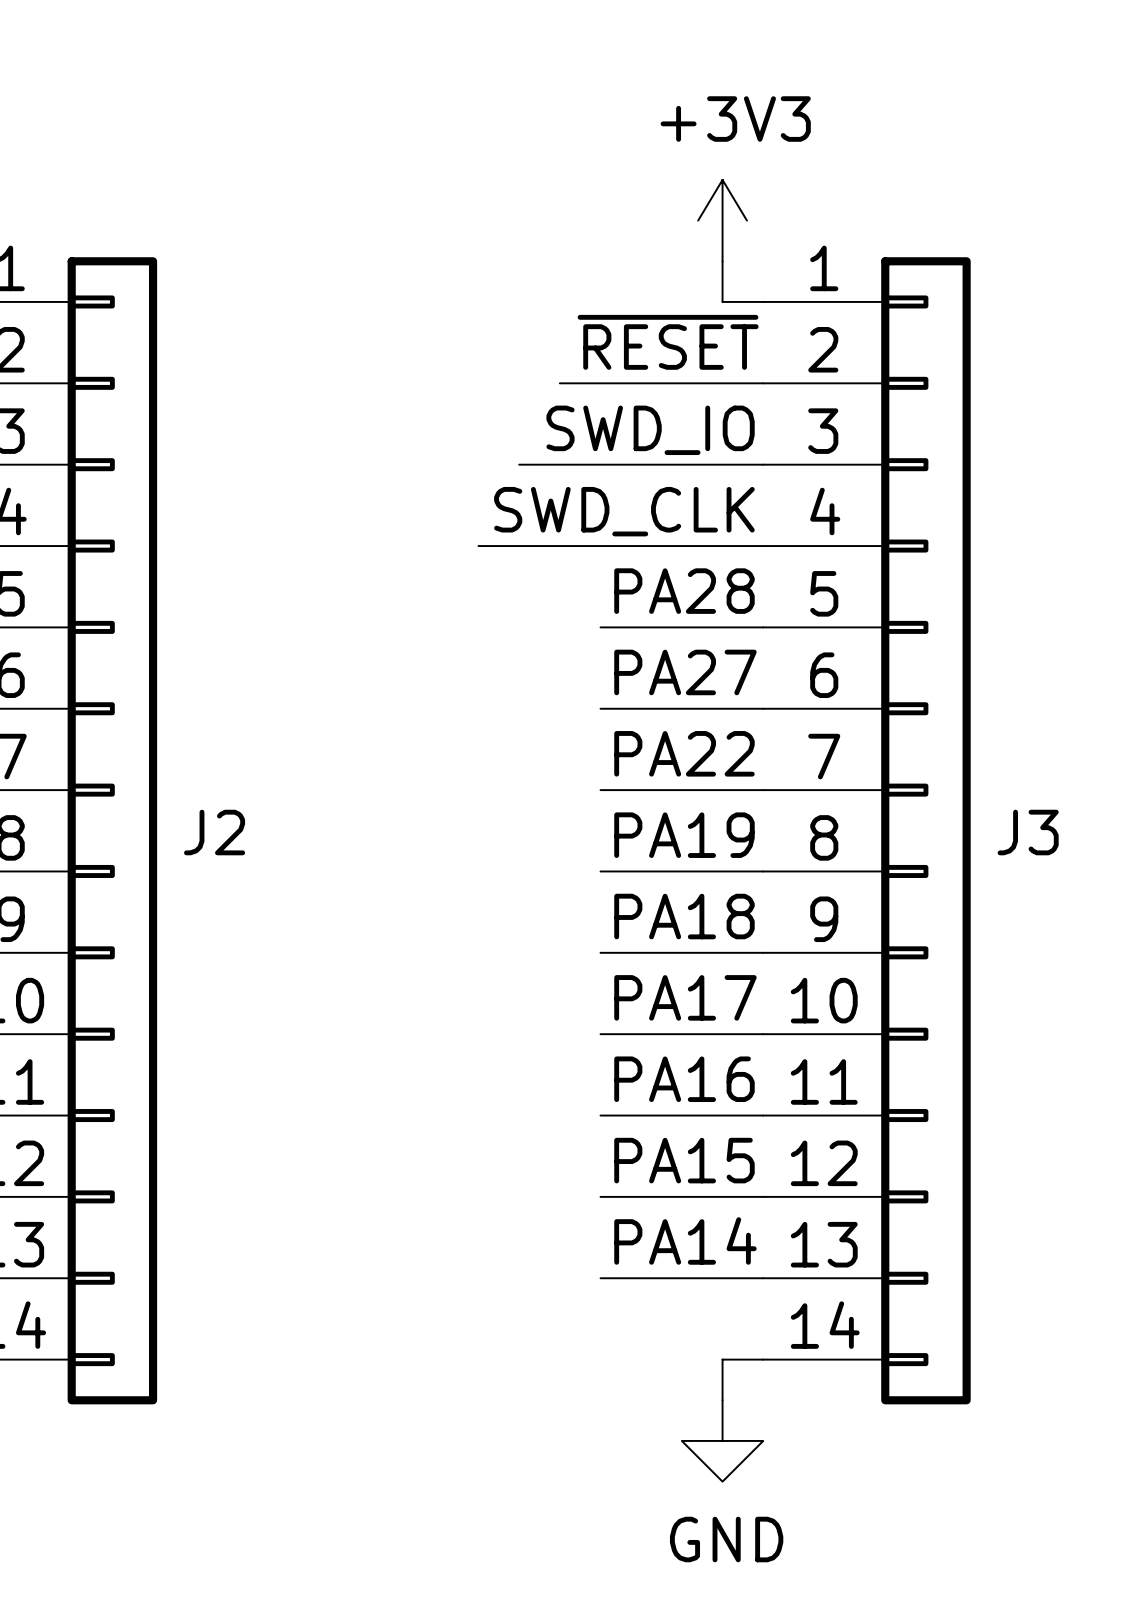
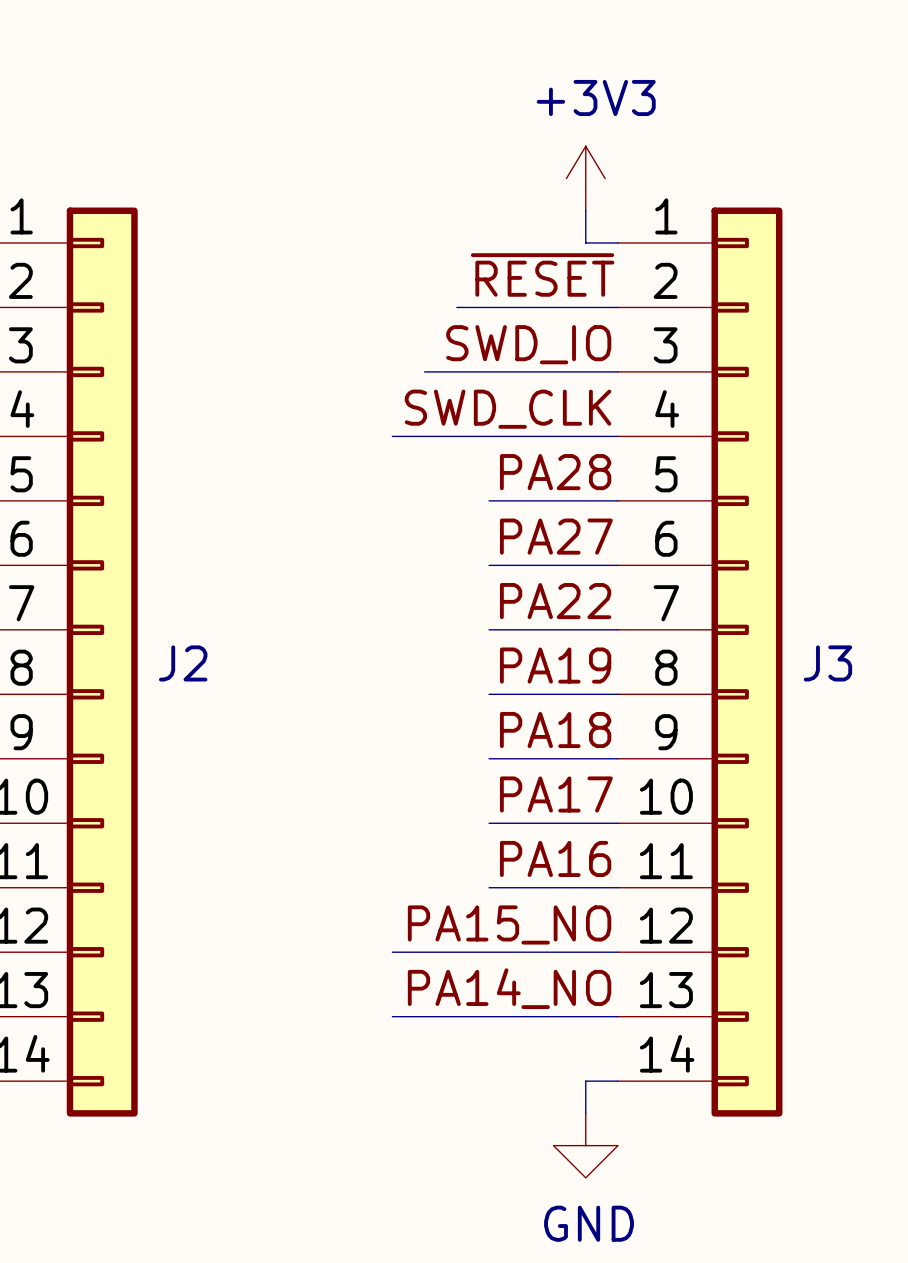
label: PA15 (684, 1160) -> PA15_NO (509, 924)
wire: none -> (392, 952) (489, 952)
label: PA14 (685, 1240) -> PA14_NO (509, 988)
wire: none -> (392, 1016) (489, 1016)

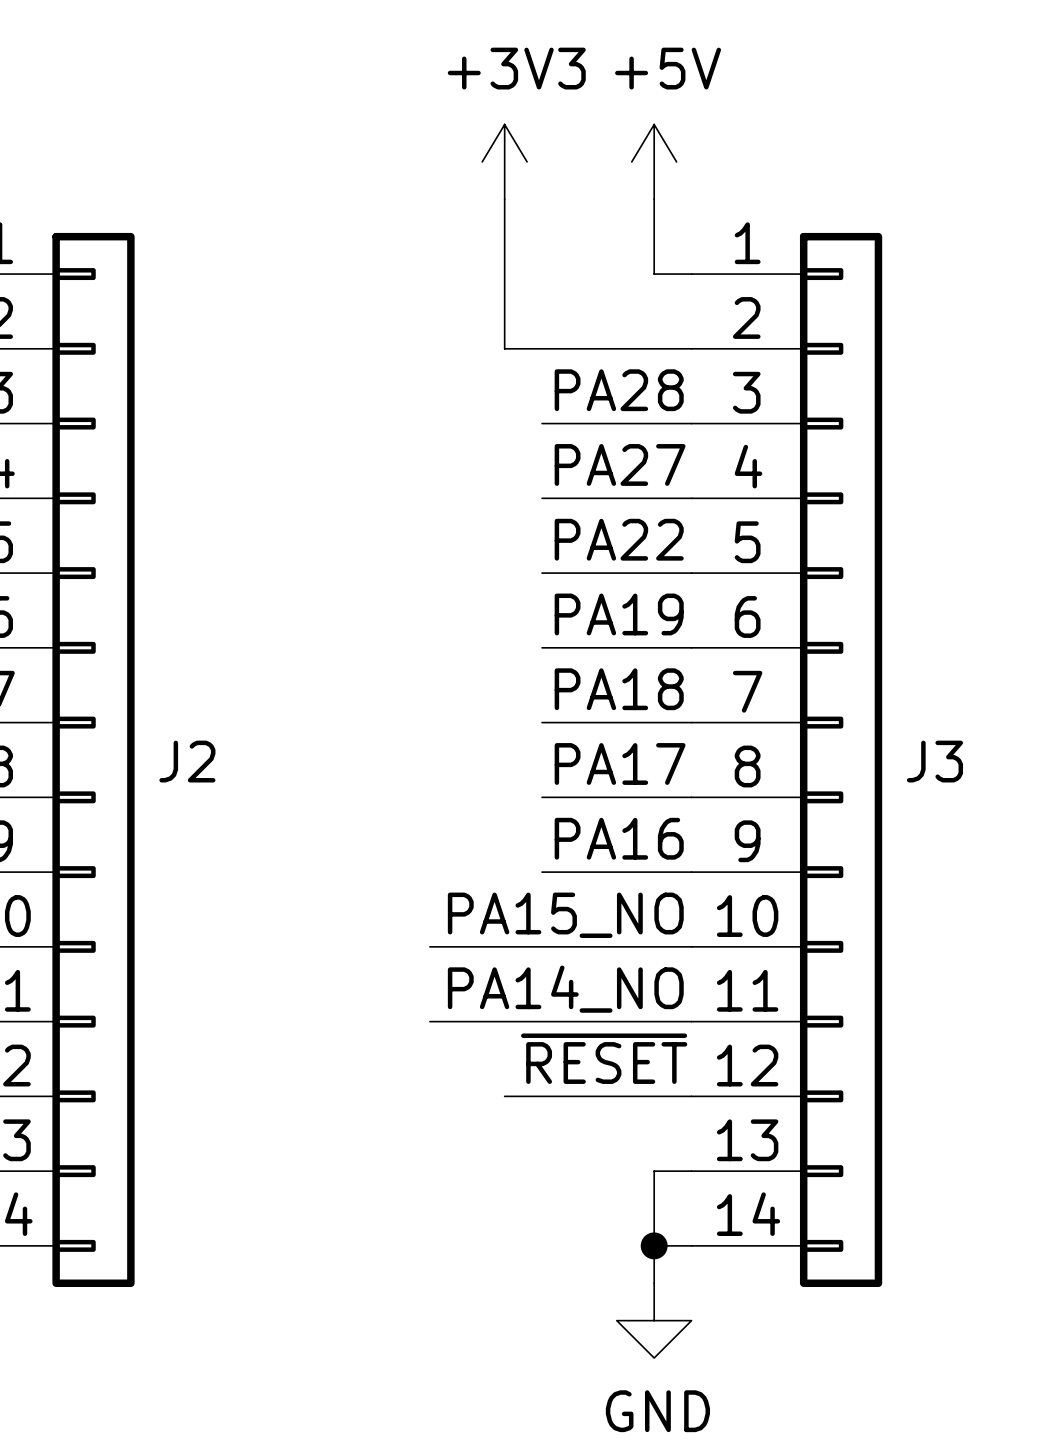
power symbol: none -> +5V (654, 161)
wire: none -> (504, 199) (504, 348)
power symbol position: +3V3 (585, 178) -> +3V3 (504, 161)
label: ~{RESET} (542, 274) -> none
label: SWD_IO (528, 344) -> PA28 (619, 390)
wire: (424, 371) (489, 371) -> none
label: SWD_CLK (508, 409) -> PA27 (620, 464)
wire: (392, 436) (489, 436) -> (429, 946) (542, 946)
label: PA28 (555, 472) -> PA22 (619, 539)
label: PA27 (556, 536) -> PA19 (619, 614)
label: PA22 (555, 601) -> PA18 (619, 689)
label: PA19 (555, 665) -> PA17 (620, 763)
label: PA18 (555, 730) -> PA16 (619, 838)
label: PA17 (556, 794) -> PA15_NO (565, 915)
label: PA16 (555, 858) -> PA14_NO (565, 989)
wire: none -> (429, 1021) (542, 1021)
label: PA15_NO (509, 924) -> ~{RESET} (604, 1058)
wire: (392, 952) (456, 952) -> none
label: PA14_NO (509, 988) -> none
wire: (392, 1016) (585, 1016) -> (654, 1245) (654, 1171)
junction: none -> (654, 1245)

